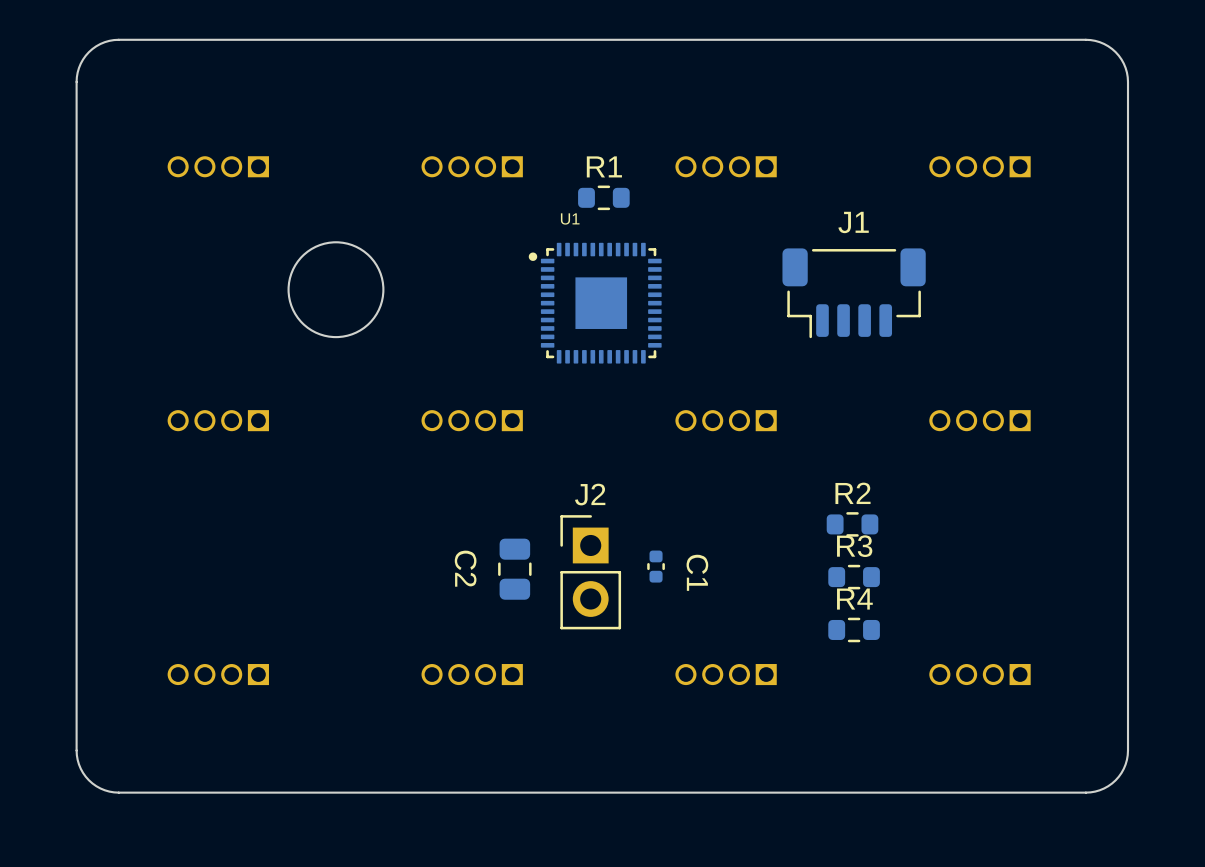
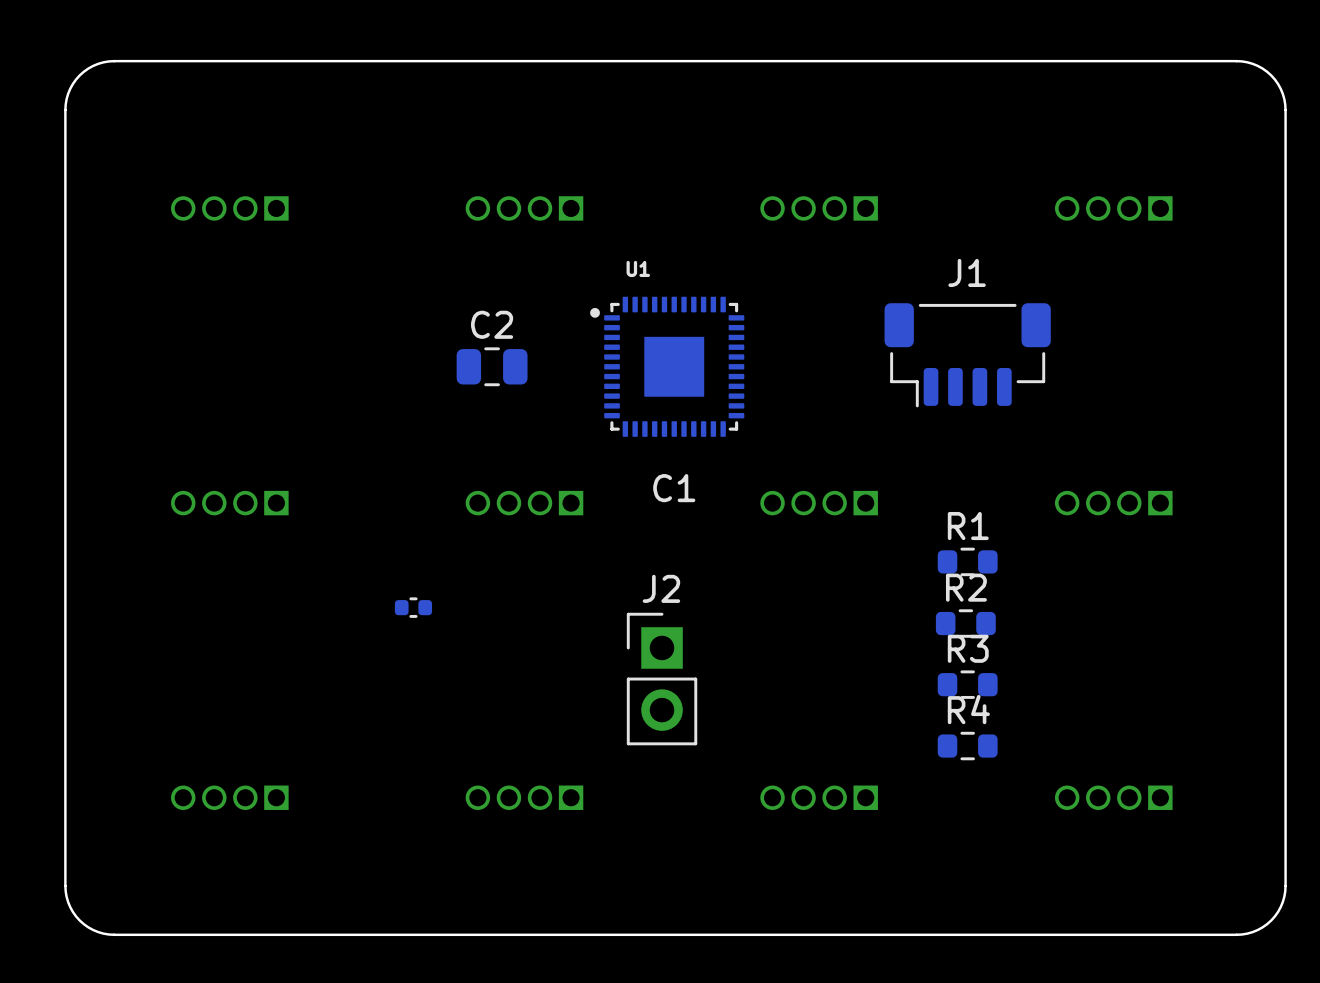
R1 position: (603, 197) -> (967, 561)
round board edge: [287, 241, 385, 339] -> none
C1 rotation: 0° (656, 566) -> 90° clockwise (413, 607)
C1 position: (656, 566) -> (413, 607)
C2 rotation: 0° (514, 569) -> 90° clockwise (492, 366)
C2 position: (514, 569) -> (492, 366)
C1 name position: C1 (697, 572) -> C1 (674, 488)

